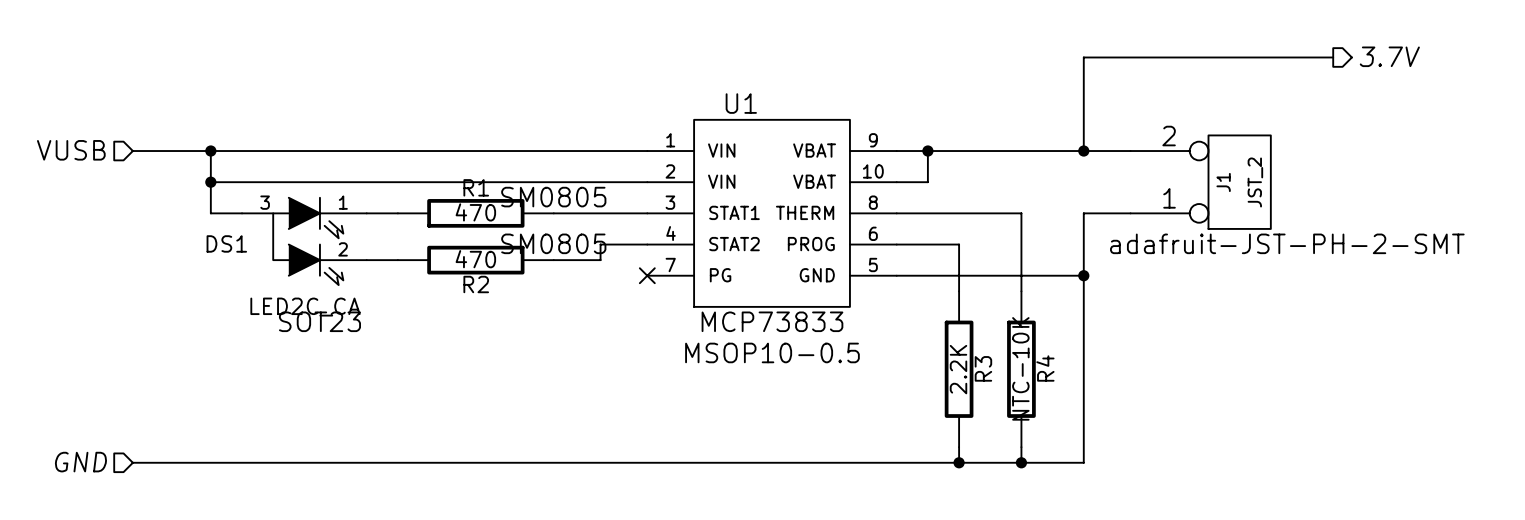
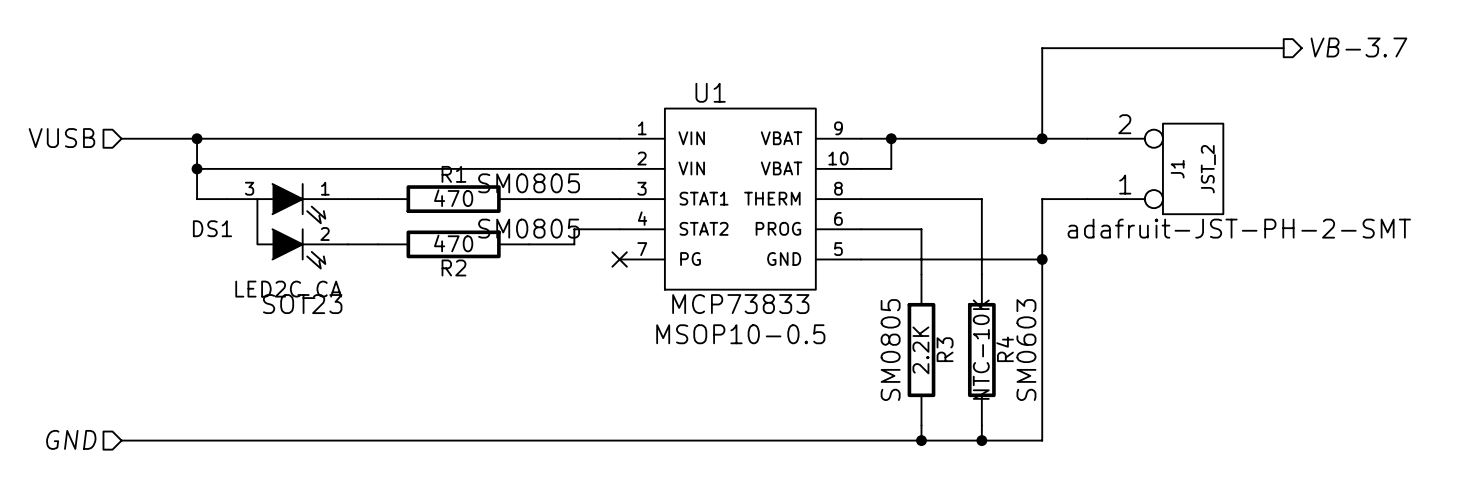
hierarchical label: 3.7V (1389, 56) -> VB-3.7 (1358, 47)
R3 text: none -> SM0805 (890, 350)
R4 text: none -> SM0603 (1026, 350)

